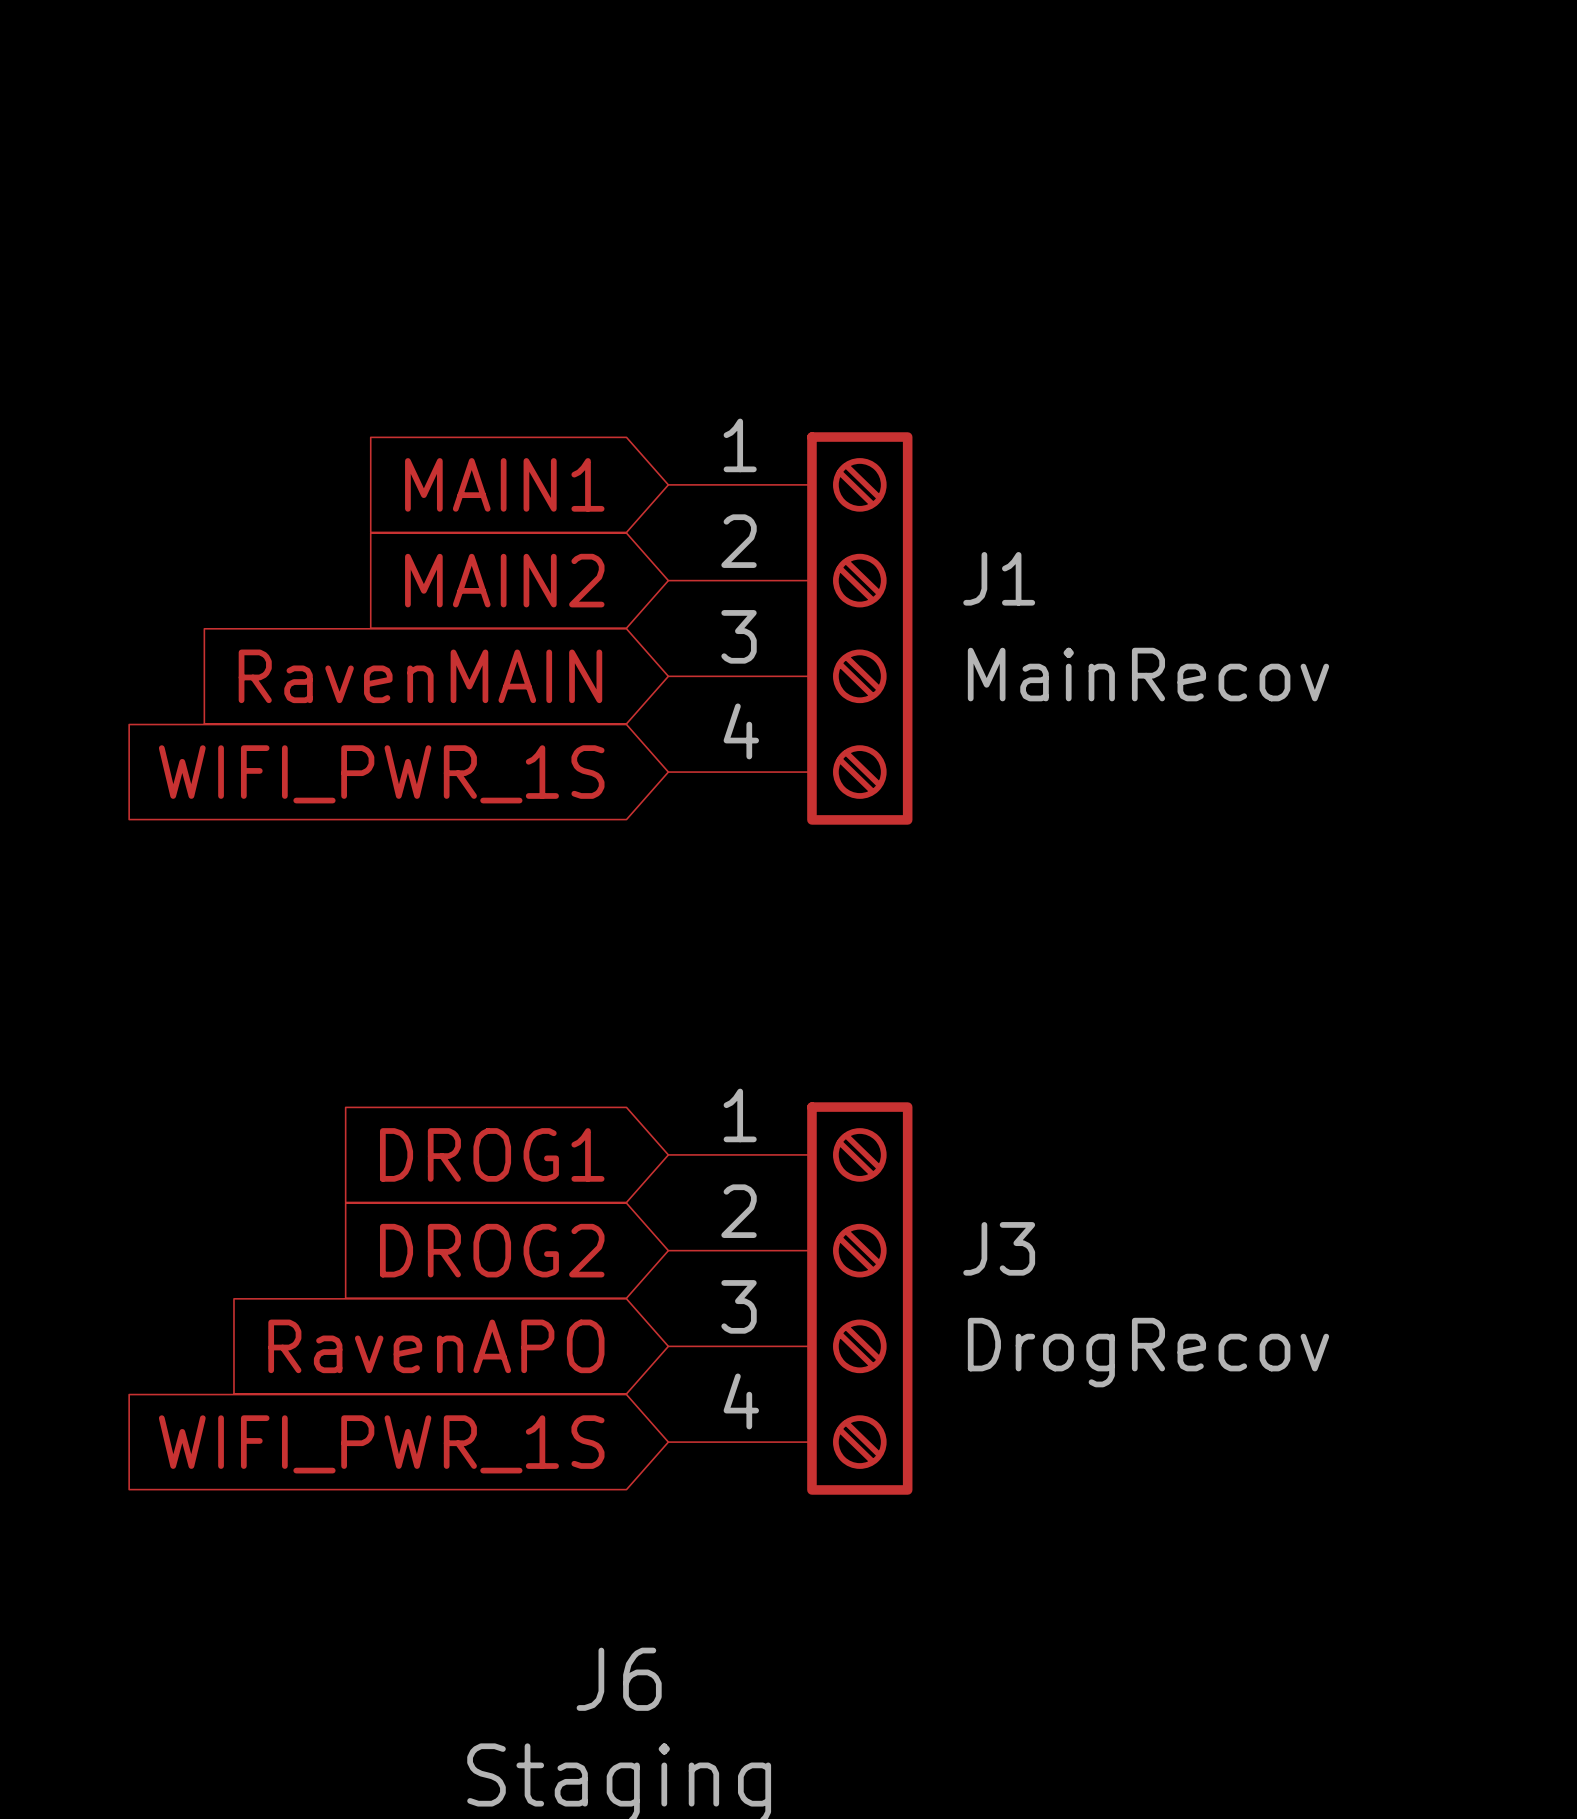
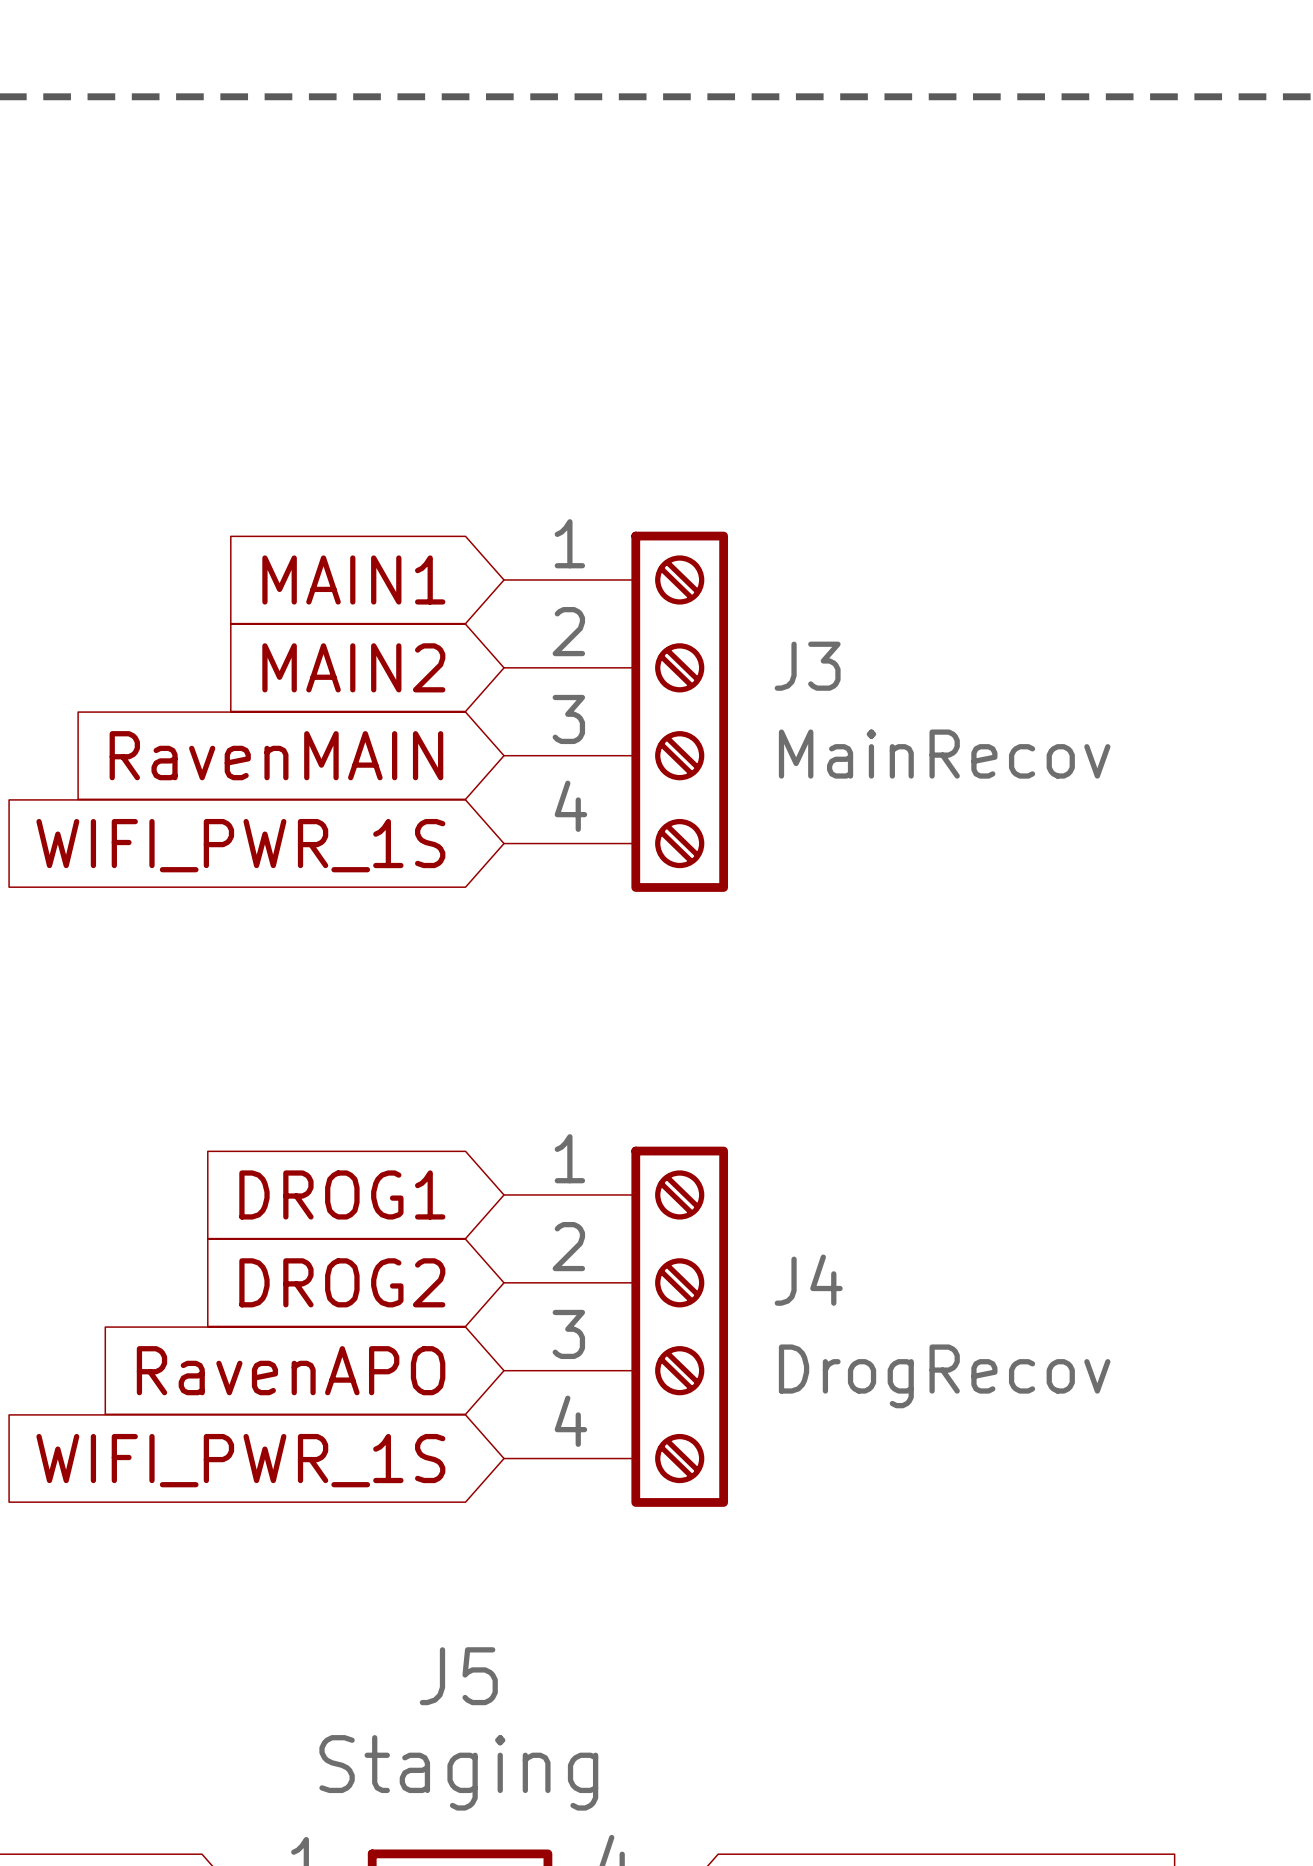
J1 name: J1 (999, 578) -> J3 (807, 666)
J3 name: J3 (999, 1248) -> J4 (808, 1280)
J6 name: J6 (619, 1679) -> J5 (458, 1676)

